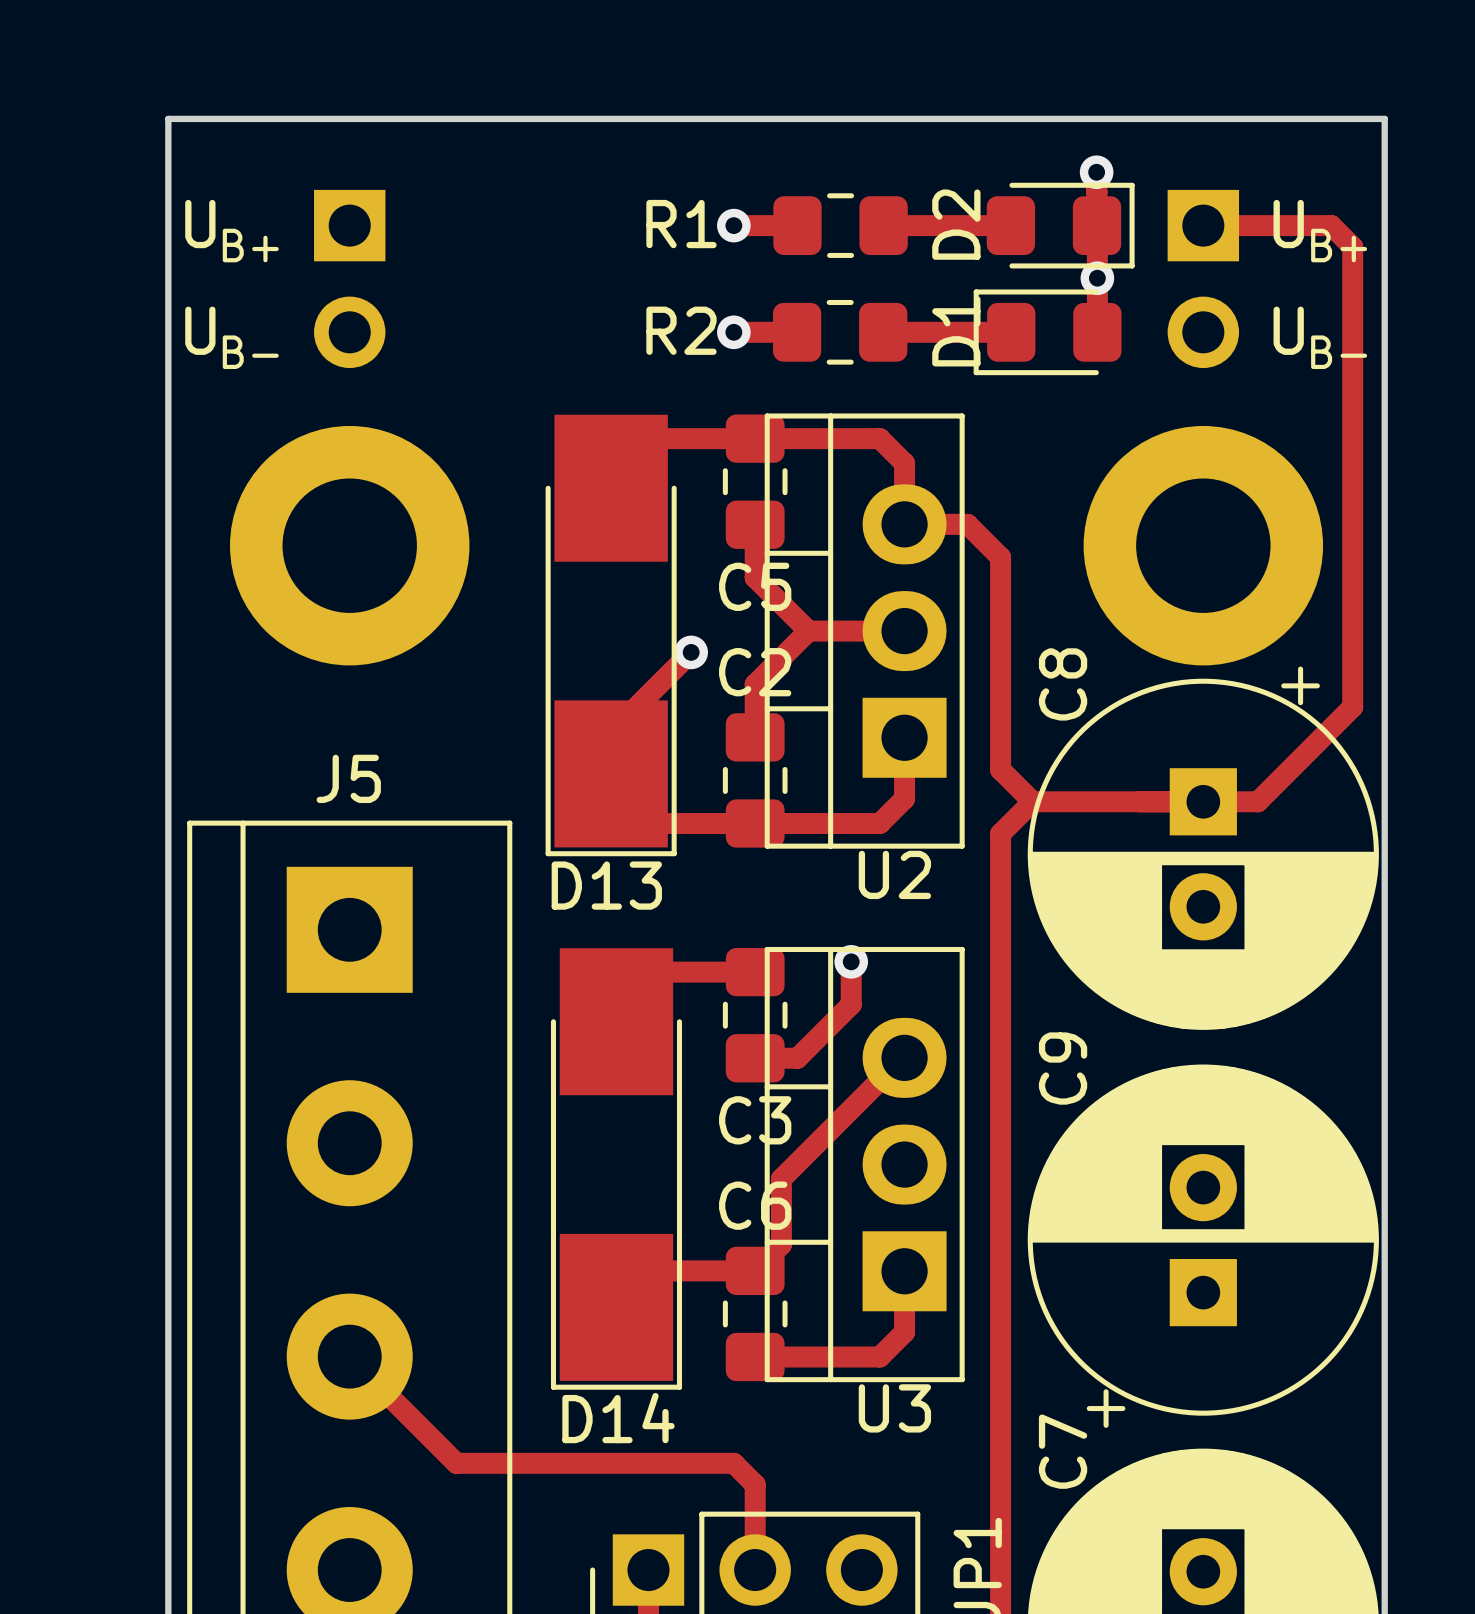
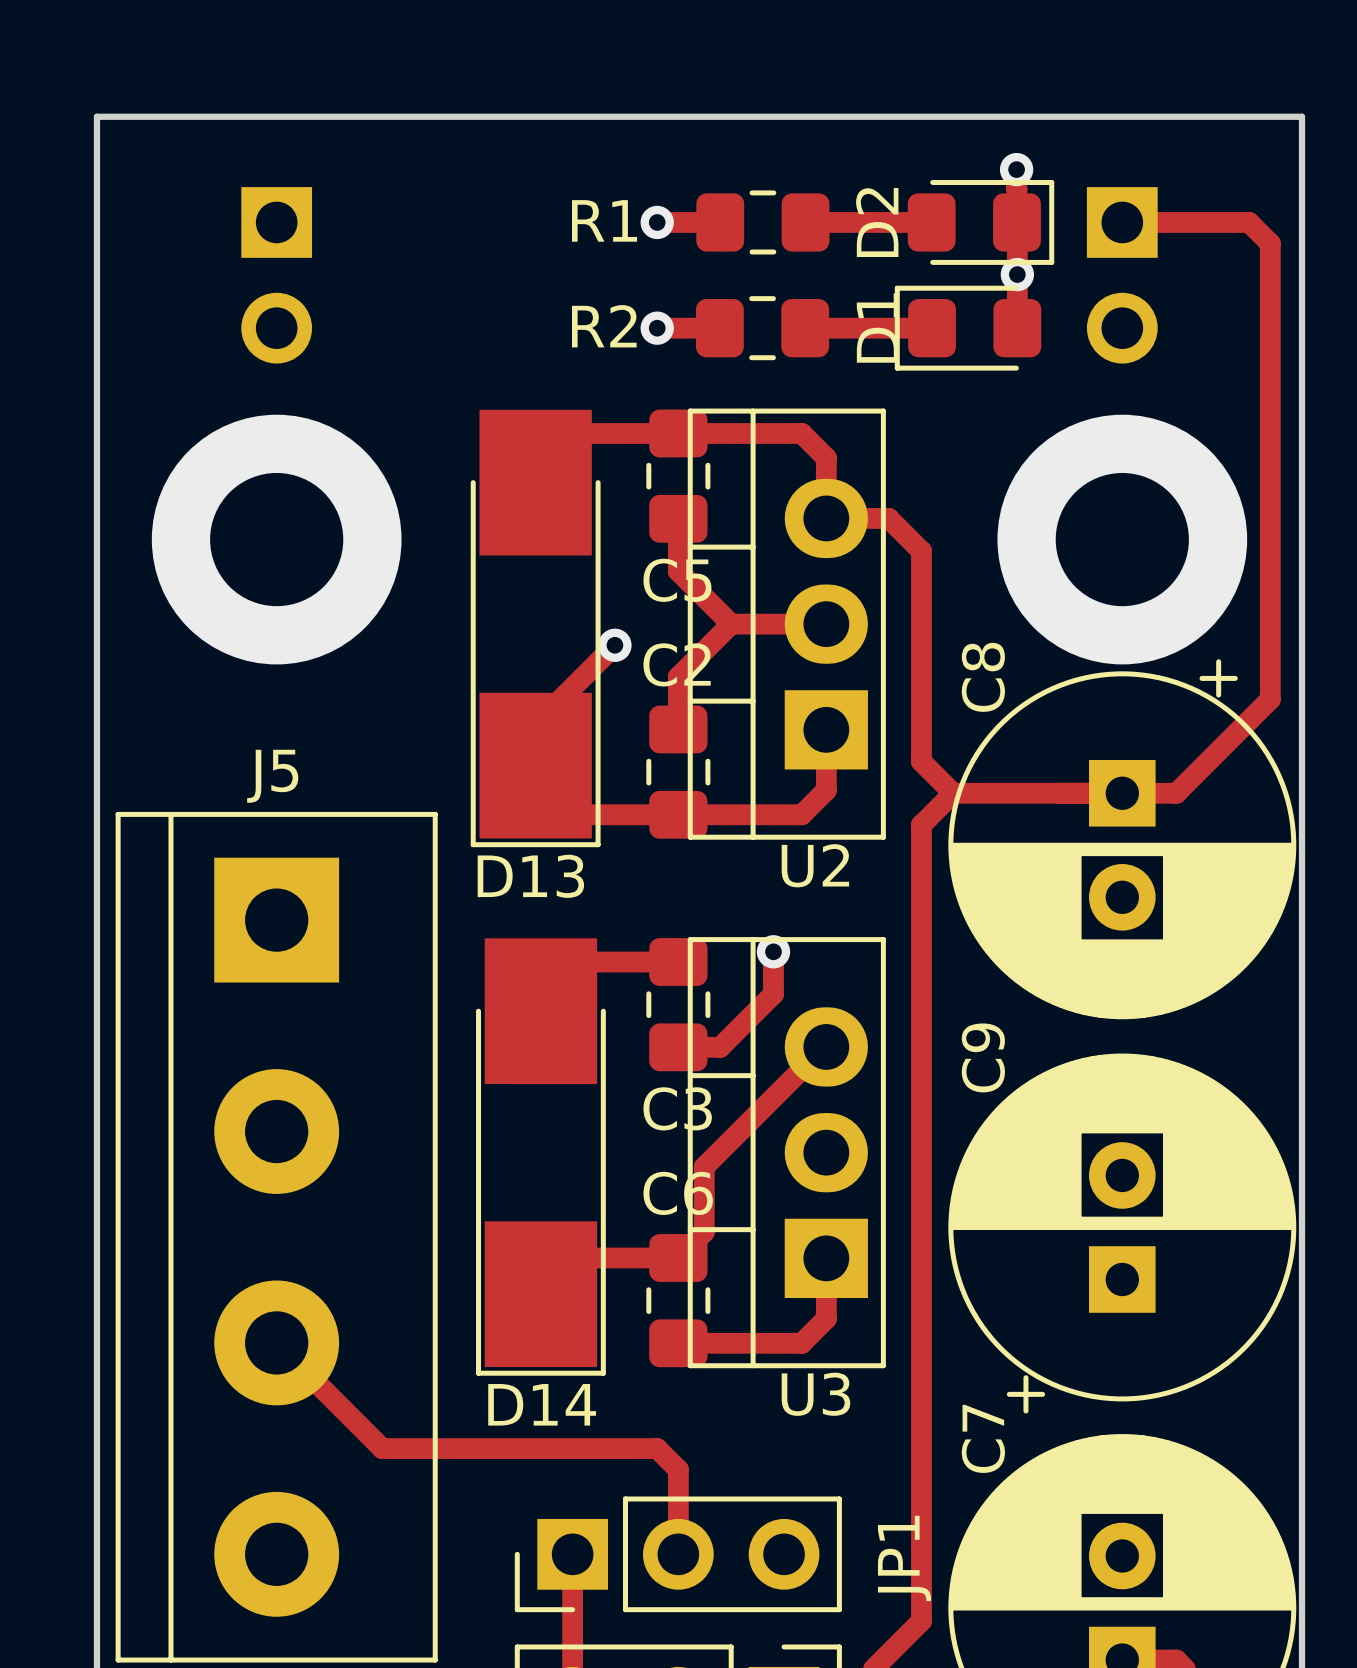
drawing: [185, 199, 279, 370] -> none
drawing: [1273, 199, 1368, 370] -> none
part: (349, 545) -> none
via: none -> (276, 539)
part: (1203, 545) -> none
via: none -> (1122, 539)

